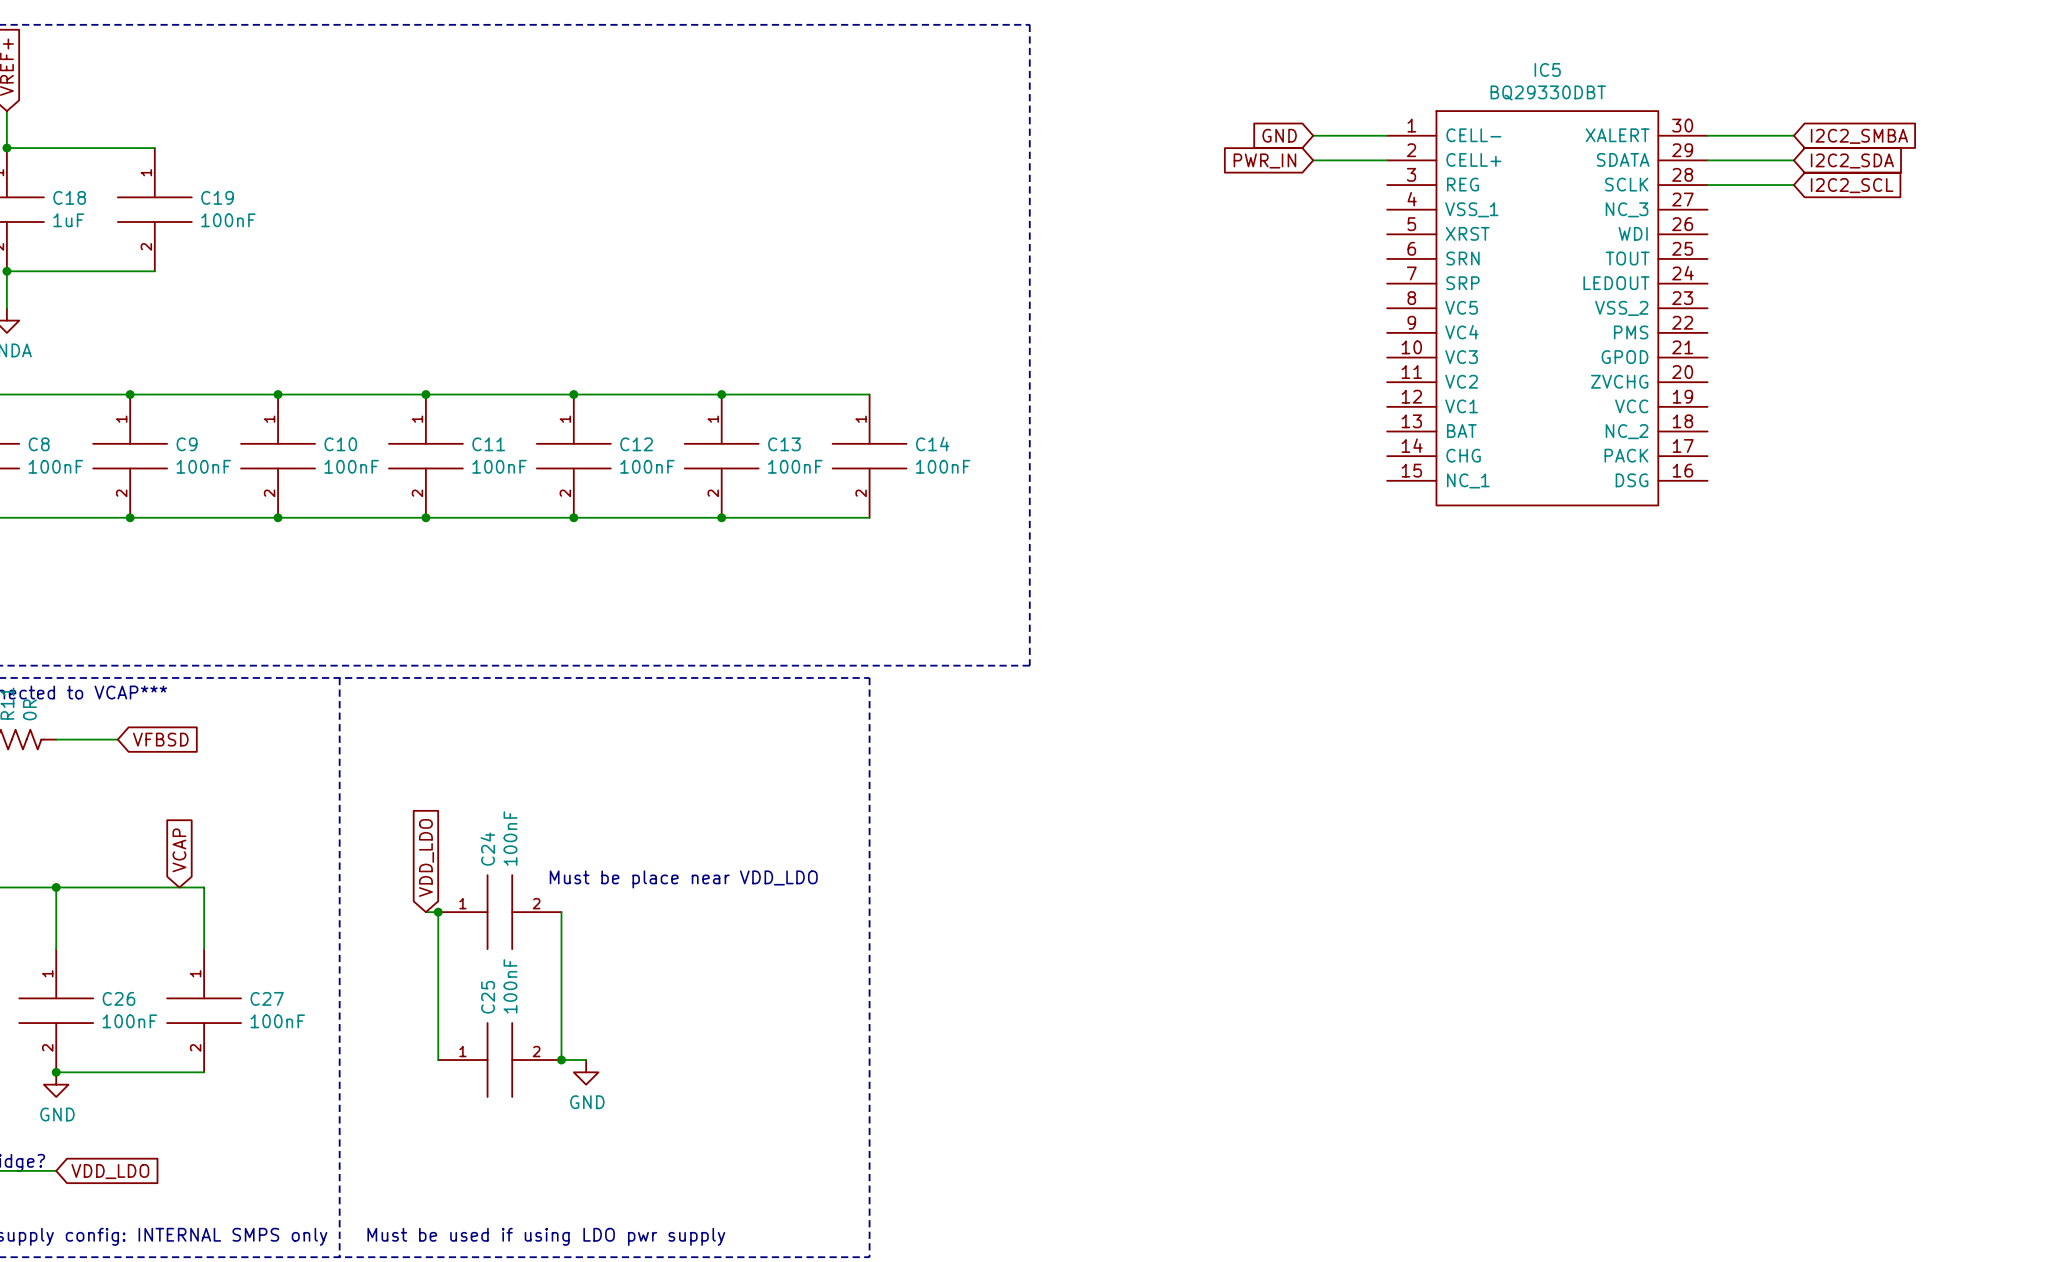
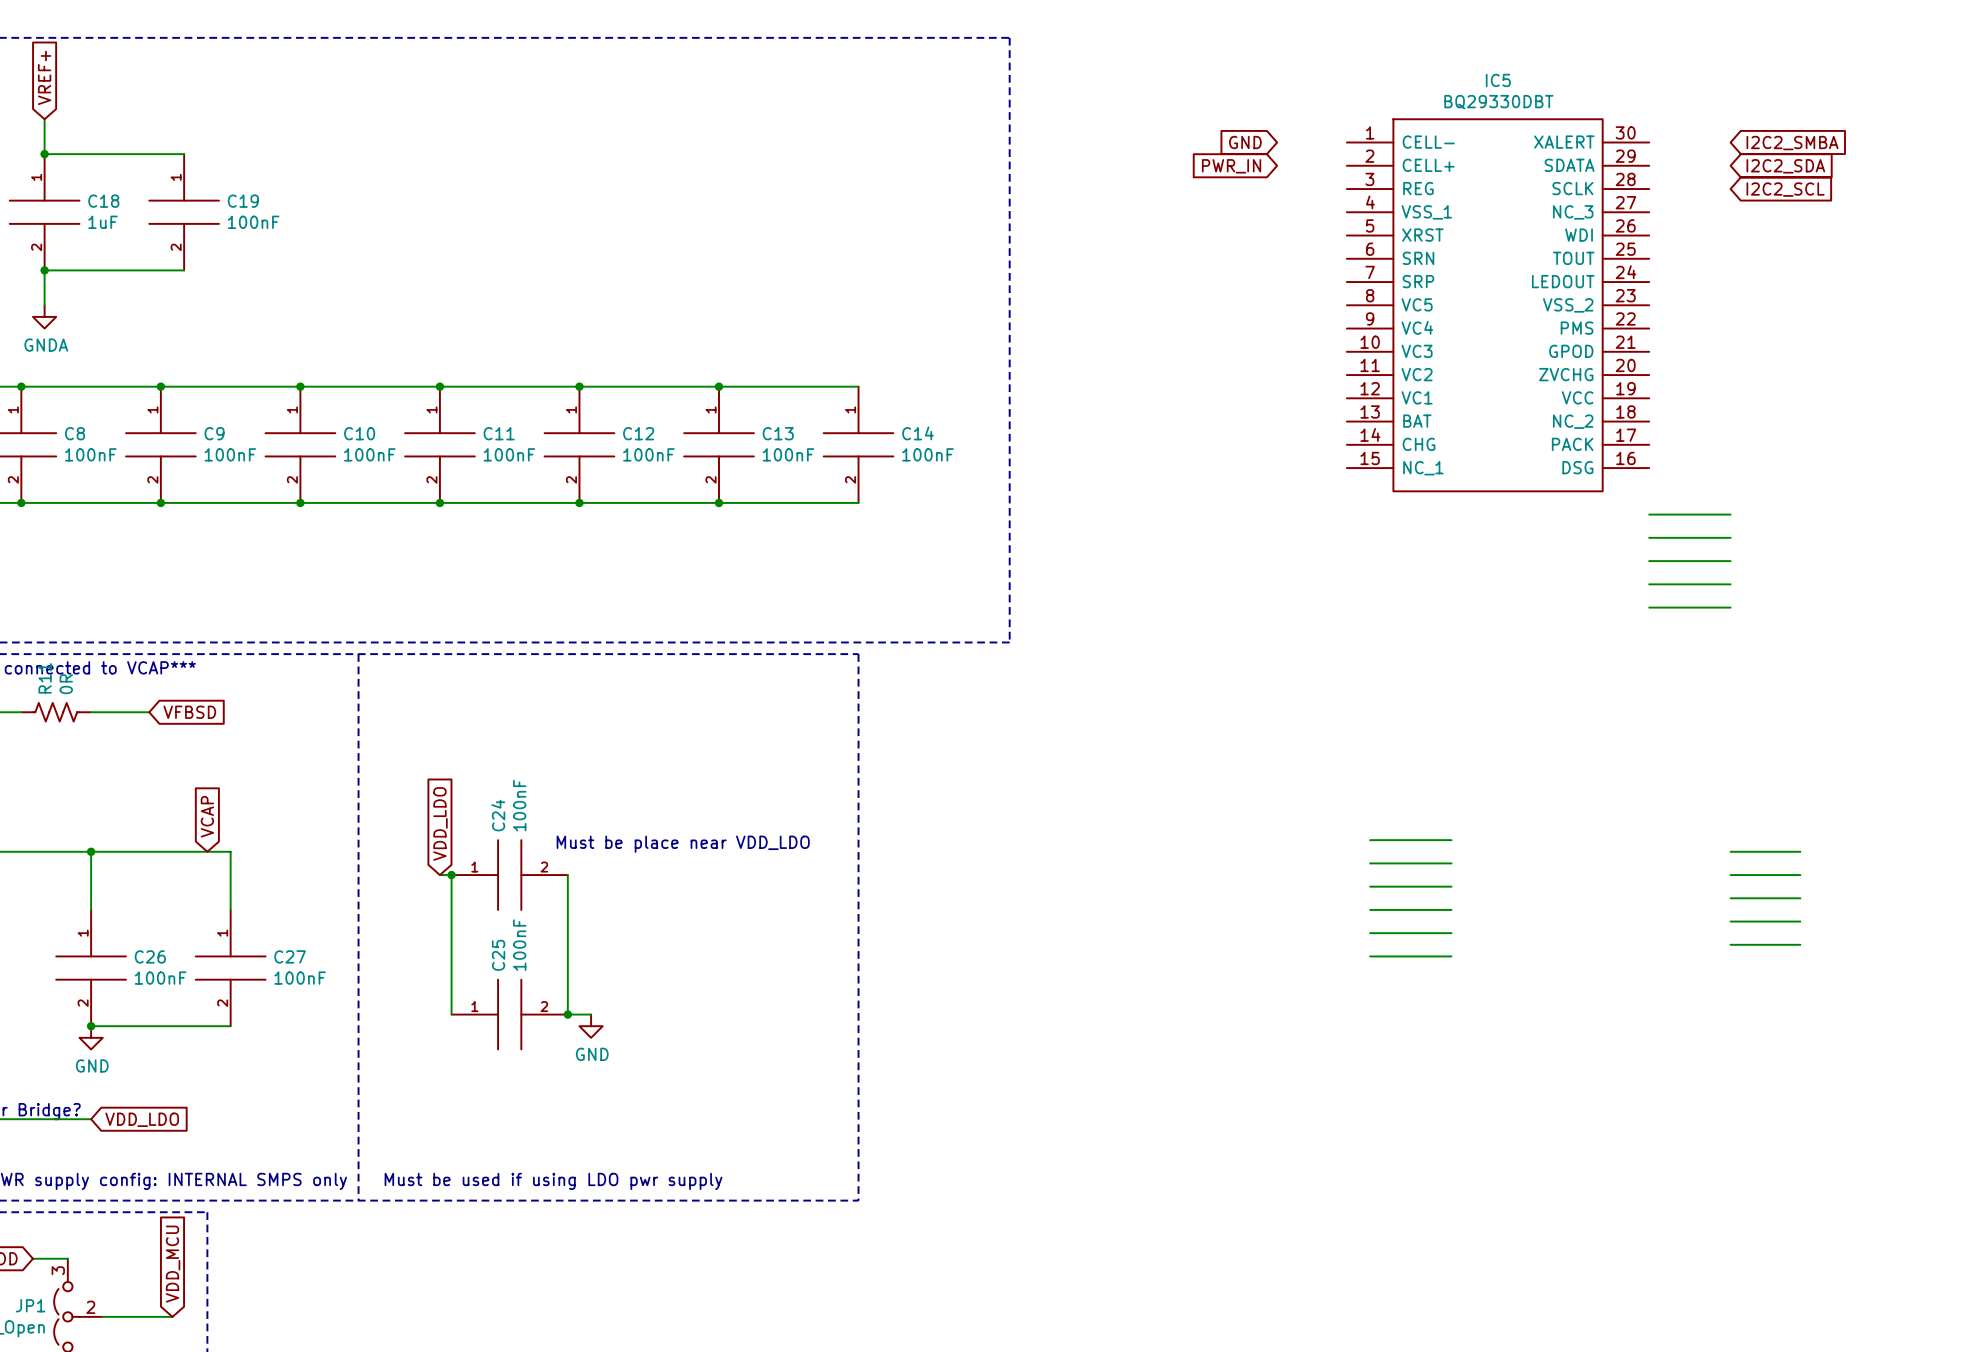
wire: (1313, 135) (1387, 135) -> none
wire: (1707, 135) (1793, 135) -> none
wire: (1313, 160) (1387, 160) -> none
wire: (1707, 160) (1793, 160) -> none
wire: (1707, 185) (1793, 185) -> none
wire: none -> (1649, 514) (1730, 514)
wire: none -> (1649, 537) (1730, 537)
wire: none -> (1649, 561) (1730, 561)
wire: none -> (1649, 584) (1730, 584)
wire: none -> (1649, 607) (1730, 607)
wire: none -> (1370, 840) (1451, 840)
wire: none -> (1730, 851) (1800, 851)
wire: none -> (1370, 863) (1451, 863)
wire: none -> (1730, 875) (1800, 875)
wire: none -> (1370, 886) (1451, 886)
wire: none -> (1730, 898) (1800, 898)
wire: none -> (1370, 909) (1451, 909)
wire: none -> (1730, 921) (1800, 921)
wire: none -> (1370, 933) (1451, 933)
wire: none -> (1730, 944) (1800, 944)
wire: none -> (1370, 956) (1451, 956)

